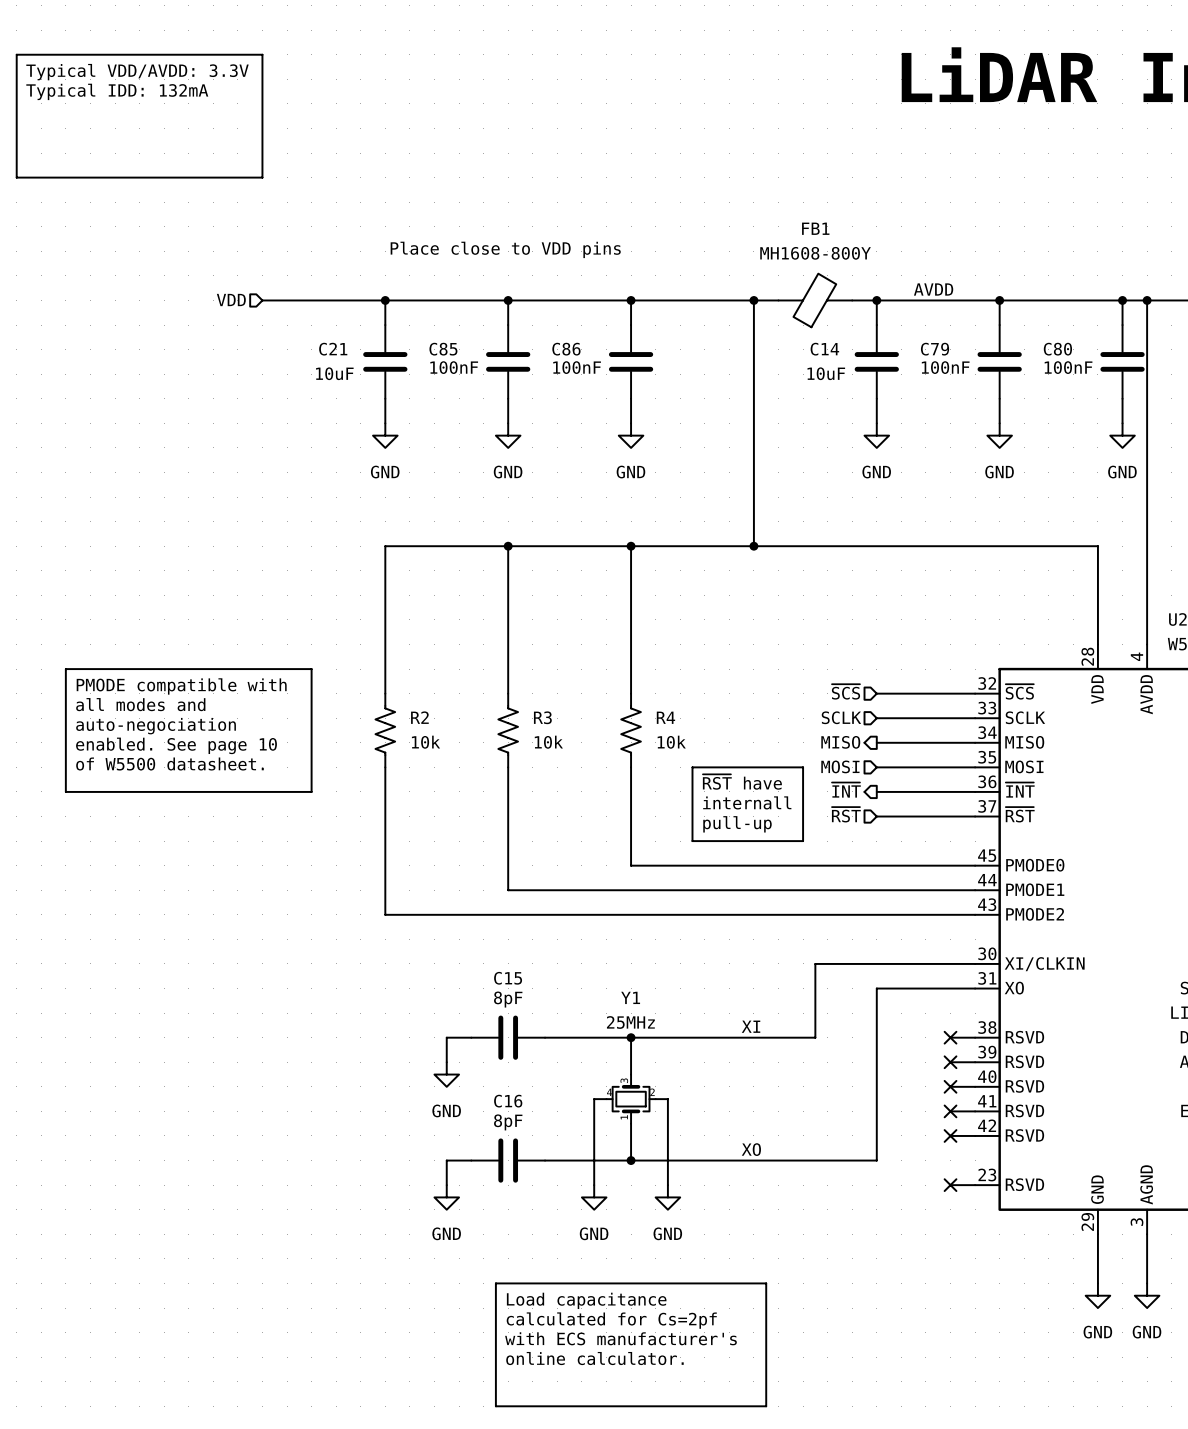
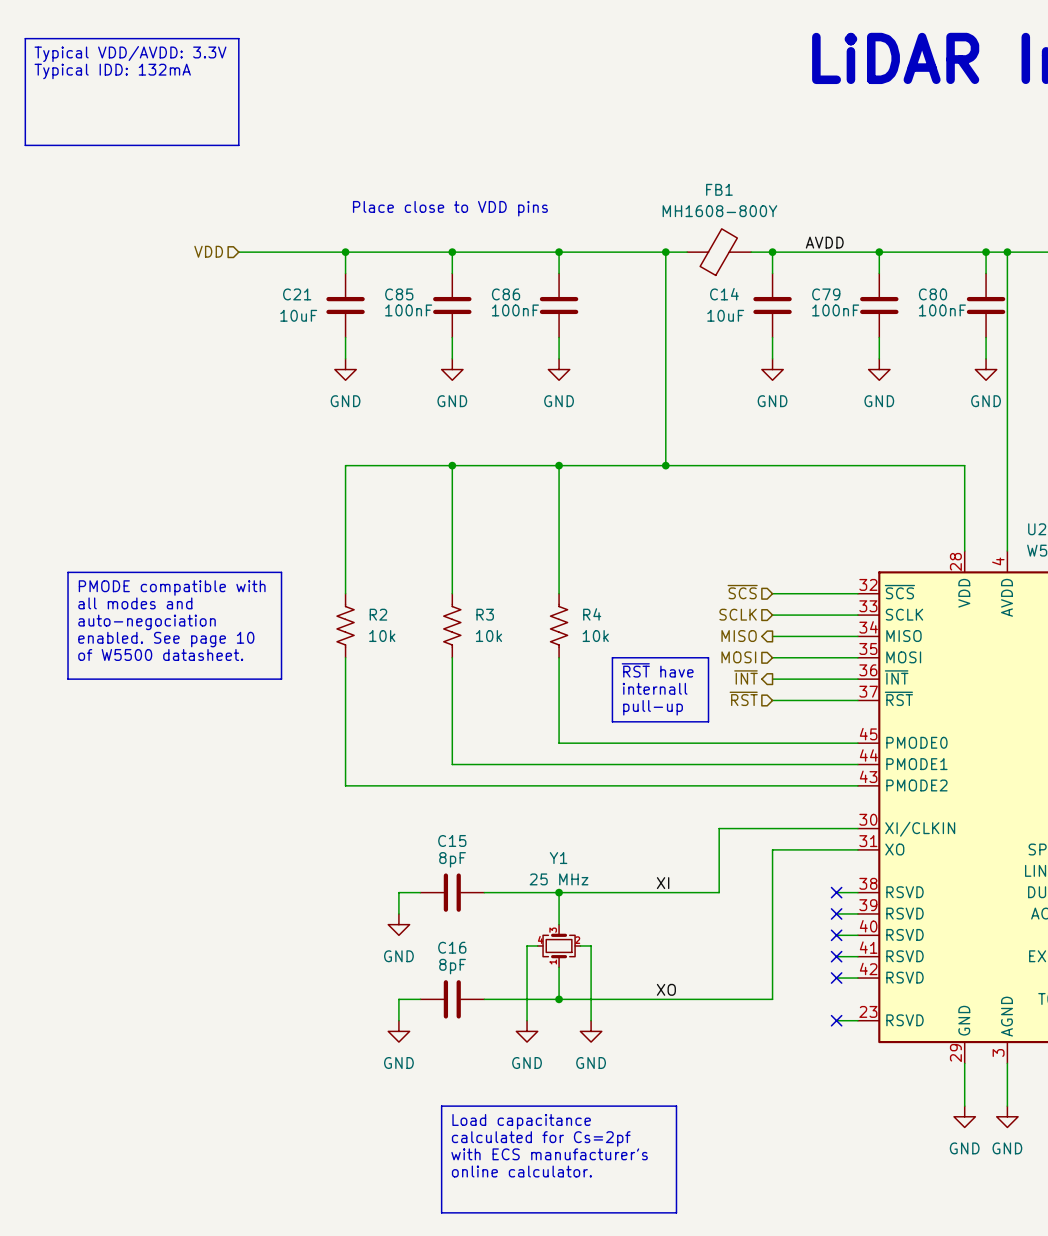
Y1 value: 25MHz (630, 1022) -> 25 MHz (559, 879)

